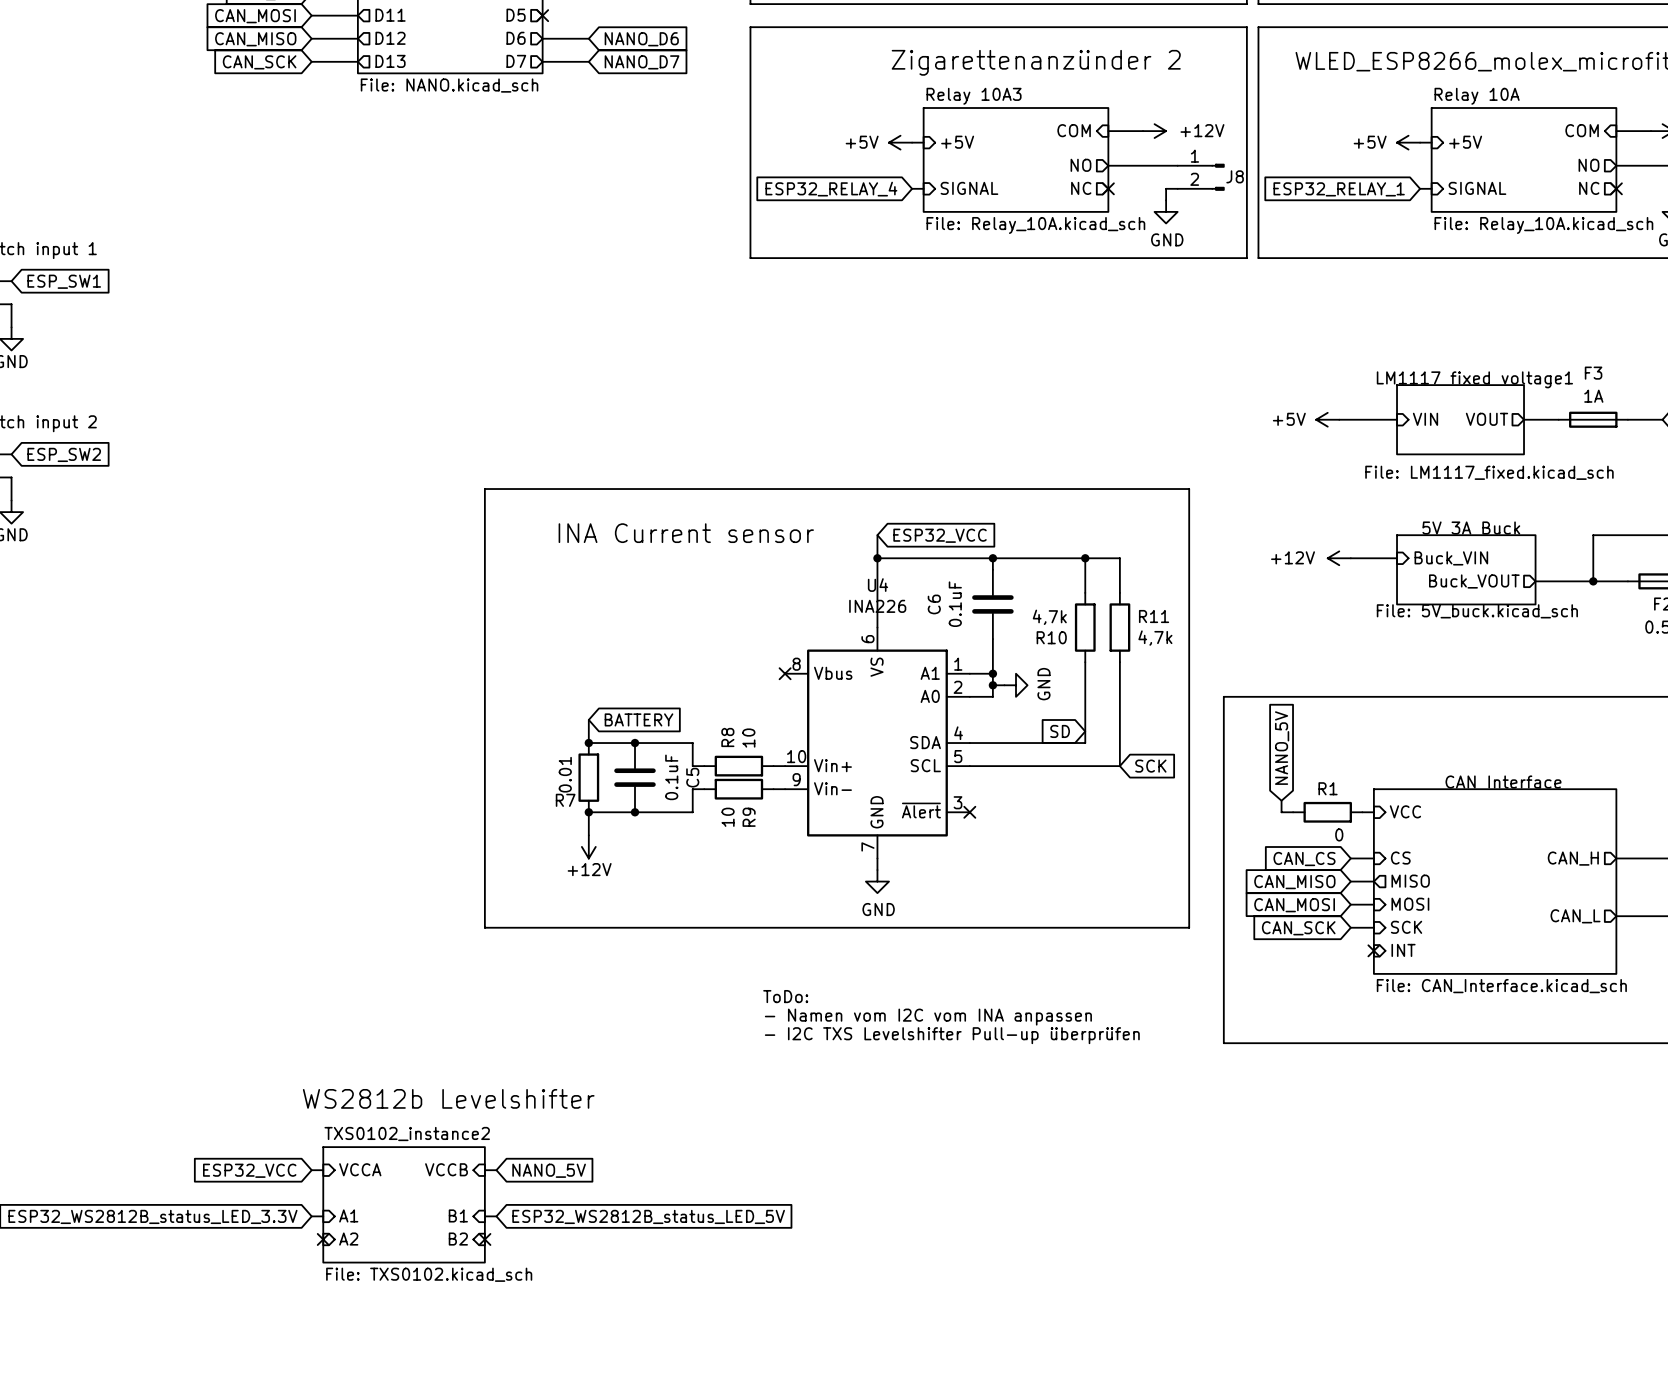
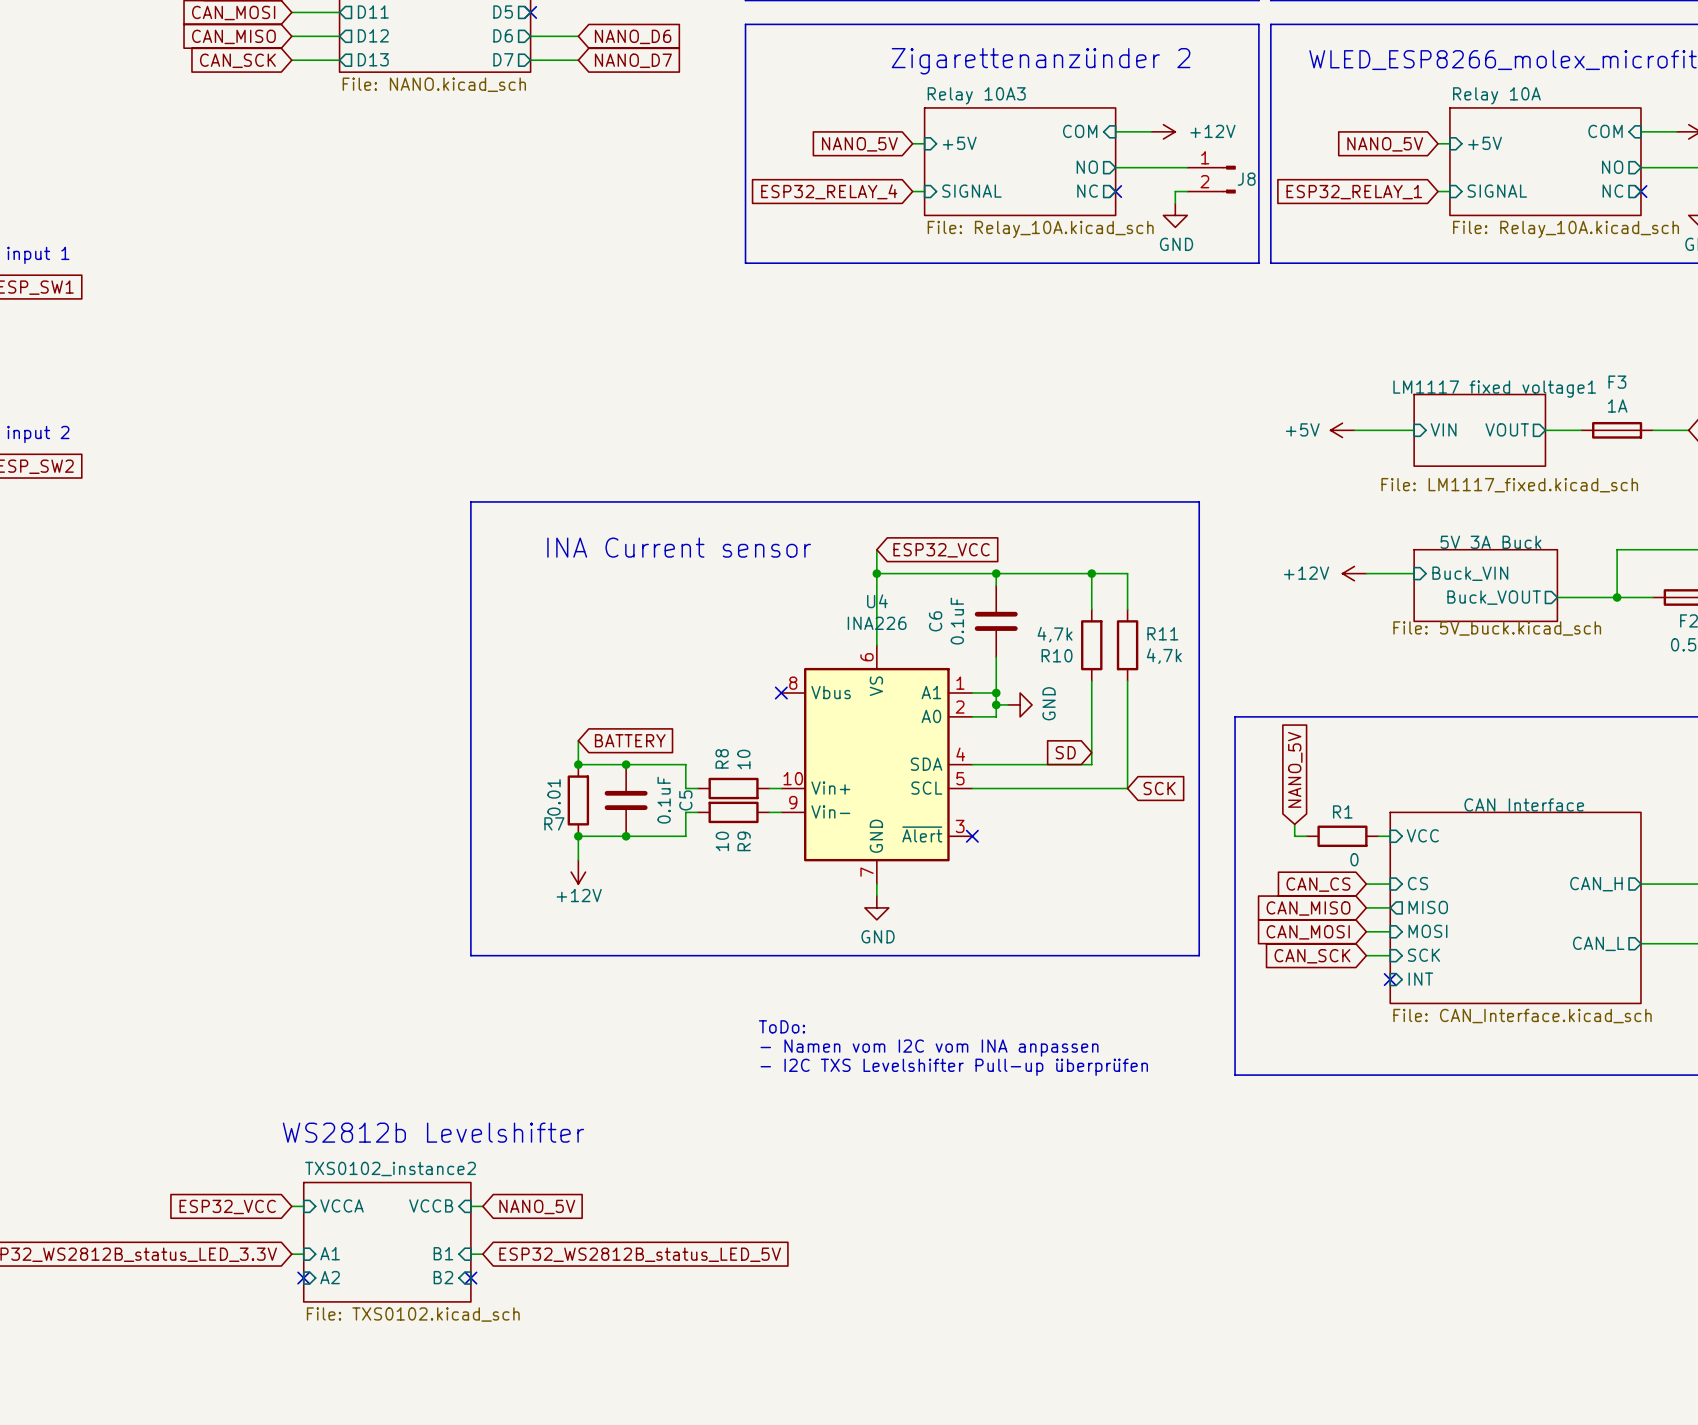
power symbol: +5V (900, 142) -> none
power symbol: +5V (1408, 142) -> none
global label: none -> NANO_5V (859, 144)
global label: none -> NANO_5V (1385, 144)

